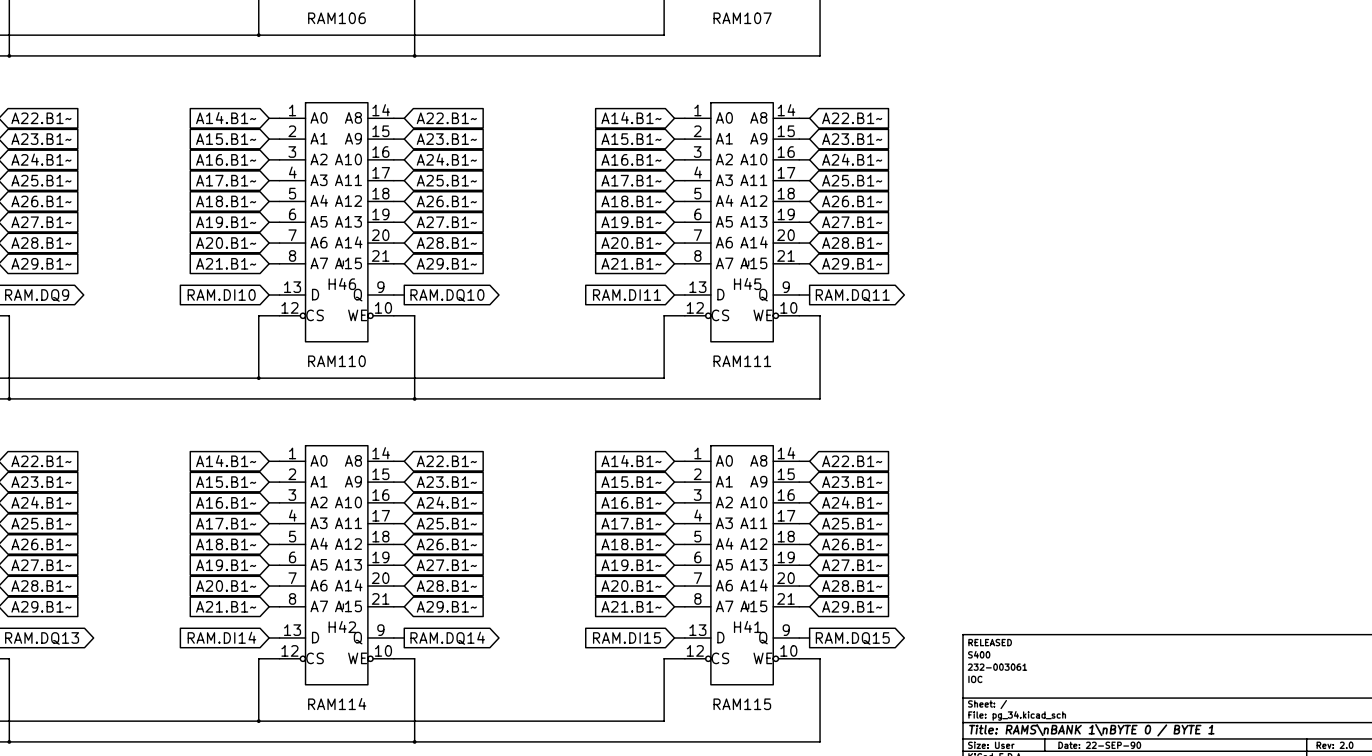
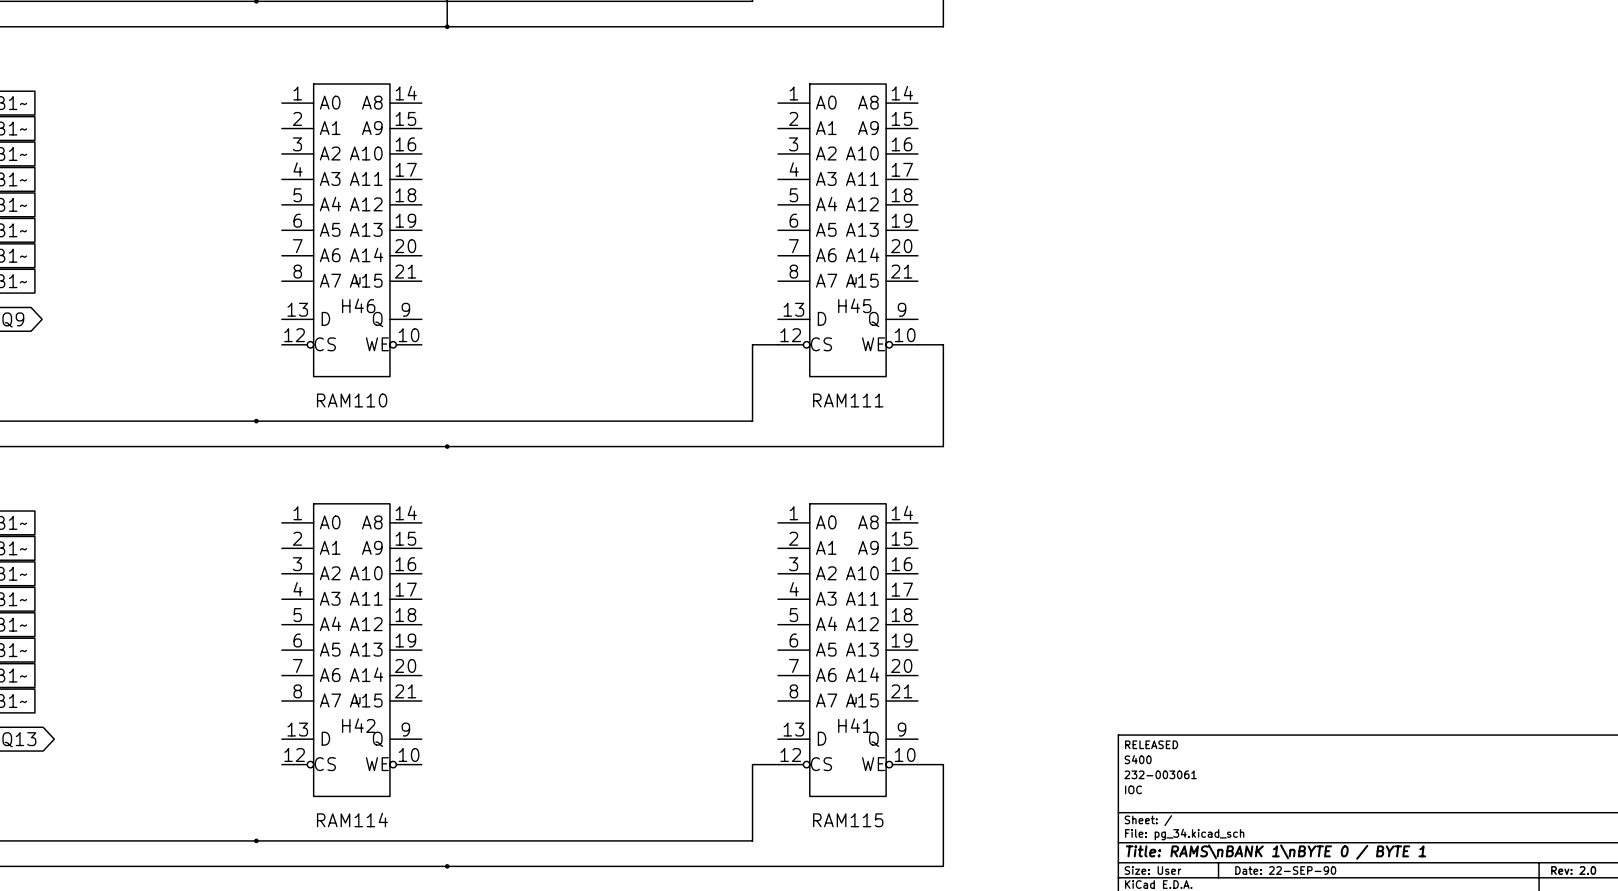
global label: A14.B1~ (226, 118) -> none
wire: (269, 118) (279, 118) -> none
wire: (393, 118) (404, 118) -> none
global label: A22.B1~ (446, 118) -> none
global label: A14.B1~ (631, 118) -> none
wire: (674, 118) (684, 118) -> none
wire: (799, 118) (809, 118) -> none
global label: A22.B1~ (852, 118) -> none
global label: A15.B1~ (226, 139) -> none
wire: (269, 139) (279, 139) -> none
wire: (393, 139) (404, 139) -> none
global label: A23.B1~ (446, 139) -> none
global label: A15.B1~ (631, 139) -> none
wire: (674, 139) (684, 139) -> none
wire: (799, 139) (809, 139) -> none
global label: A23.B1~ (852, 139) -> none
global label: A16.B1~ (226, 159) -> none
wire: (269, 159) (279, 159) -> none
wire: (393, 159) (404, 159) -> none
global label: A24.B1~ (446, 159) -> none
global label: A16.B1~ (631, 159) -> none
wire: (674, 159) (684, 159) -> none
wire: (799, 159) (809, 159) -> none
global label: A24.B1~ (852, 159) -> none
global label: A17.B1~ (226, 180) -> none
wire: (269, 180) (279, 180) -> none
wire: (393, 180) (404, 180) -> none
global label: A25.B1~ (446, 180) -> none
global label: A17.B1~ (631, 180) -> none
wire: (674, 180) (684, 180) -> none
wire: (799, 180) (809, 180) -> none
global label: A25.B1~ (852, 180) -> none
global label: A18.B1~ (226, 201) -> none
wire: (269, 201) (279, 201) -> none
wire: (393, 201) (404, 201) -> none
global label: A26.B1~ (446, 201) -> none
global label: A18.B1~ (631, 201) -> none
wire: (674, 201) (684, 201) -> none
wire: (799, 201) (809, 201) -> none
global label: A26.B1~ (852, 201) -> none
global label: A19.B1~ (226, 222) -> none
wire: (269, 222) (279, 222) -> none
wire: (393, 222) (404, 222) -> none
global label: A27.B1~ (446, 222) -> none
global label: A19.B1~ (631, 222) -> none
wire: (674, 222) (684, 222) -> none
wire: (799, 222) (809, 222) -> none
global label: A27.B1~ (852, 222) -> none
global label: A20.B1~ (226, 243) -> none
wire: (269, 243) (279, 243) -> none
wire: (393, 243) (404, 243) -> none
global label: A28.B1~ (446, 243) -> none
global label: A20.B1~ (631, 243) -> none
wire: (674, 243) (684, 243) -> none
wire: (799, 243) (809, 243) -> none
global label: A28.B1~ (852, 243) -> none
global label: A21.B1~ (226, 263) -> none
wire: (269, 263) (279, 263) -> none
wire: (393, 263) (404, 263) -> none
global label: A29.B1~ (446, 263) -> none
global label: A21.B1~ (631, 263) -> none
wire: (674, 263) (684, 263) -> none
wire: (799, 263) (809, 263) -> none
global label: A29.B1~ (852, 263) -> none
global label: RAM.DI10 (221, 295) -> none
wire: (269, 295) (279, 295) -> none
wire: (393, 295) (404, 295) -> none
global label: RAM.DQ10 (447, 295) -> none
global label: RAM.DI11 (627, 295) -> none
wire: (674, 295) (684, 295) -> none
wire: (799, 295) (809, 295) -> none
global label: RAM.DQ11 (852, 295) -> none
wire: (279, 315) (258, 315) (258, 378) -> none
wire: (393, 315) (414, 315) (414, 398) -> none
global label: A14.B1~ (226, 461) -> none
wire: (269, 461) (279, 461) -> none
wire: (393, 461) (404, 461) -> none
global label: A22.B1~ (446, 461) -> none
global label: A14.B1~ (631, 461) -> none
wire: (674, 461) (684, 461) -> none
wire: (799, 461) (809, 461) -> none
global label: A22.B1~ (852, 461) -> none
global label: A15.B1~ (226, 482) -> none
wire: (269, 482) (279, 482) -> none
wire: (393, 482) (404, 482) -> none
global label: A23.B1~ (446, 482) -> none
global label: A15.B1~ (631, 482) -> none
wire: (674, 482) (684, 482) -> none
wire: (799, 482) (809, 482) -> none
global label: A23.B1~ (852, 482) -> none
global label: A16.B1~ (226, 502) -> none
wire: (269, 502) (279, 502) -> none
wire: (393, 502) (404, 502) -> none
global label: A24.B1~ (446, 502) -> none
global label: A16.B1~ (631, 502) -> none
wire: (674, 502) (684, 502) -> none
wire: (799, 502) (809, 502) -> none
global label: A24.B1~ (852, 502) -> none
global label: A17.B1~ (226, 523) -> none
wire: (269, 523) (279, 523) -> none
wire: (393, 523) (404, 523) -> none
global label: A25.B1~ (446, 523) -> none
global label: A17.B1~ (631, 523) -> none
wire: (674, 523) (684, 523) -> none
wire: (799, 523) (809, 523) -> none
global label: A25.B1~ (852, 523) -> none
global label: A18.B1~ (226, 544) -> none
wire: (269, 544) (279, 544) -> none
wire: (393, 544) (404, 544) -> none
global label: A26.B1~ (446, 544) -> none
global label: A18.B1~ (631, 544) -> none
wire: (674, 544) (684, 544) -> none
wire: (799, 544) (809, 544) -> none
global label: A26.B1~ (852, 544) -> none
global label: A19.B1~ (226, 565) -> none
wire: (269, 565) (279, 565) -> none
wire: (393, 565) (404, 565) -> none
global label: A27.B1~ (446, 565) -> none
global label: A19.B1~ (631, 565) -> none
wire: (674, 565) (684, 565) -> none
wire: (799, 565) (809, 565) -> none
global label: A27.B1~ (852, 565) -> none
global label: A20.B1~ (226, 586) -> none
wire: (269, 586) (279, 586) -> none
wire: (393, 586) (404, 586) -> none
global label: A28.B1~ (446, 586) -> none
global label: A20.B1~ (631, 586) -> none
wire: (674, 586) (684, 586) -> none
wire: (799, 586) (809, 586) -> none
global label: A28.B1~ (852, 586) -> none
global label: A21.B1~ (226, 606) -> none
wire: (269, 606) (279, 606) -> none
wire: (393, 606) (404, 606) -> none
global label: A29.B1~ (446, 606) -> none
global label: A21.B1~ (631, 606) -> none
wire: (674, 606) (684, 606) -> none
wire: (799, 606) (809, 606) -> none
global label: A29.B1~ (852, 606) -> none
global label: RAM.DI14 (221, 637) -> none
wire: (269, 637) (279, 637) -> none
wire: (393, 637) (404, 637) -> none
global label: RAM.DI15 (627, 637) -> none
wire: (674, 637) (684, 637) -> none
wire: (799, 637) (809, 637) -> none
global label: RAM.DQ14 (447, 638) -> none
global label: RAM.DQ15 (852, 638) -> none
wire: (279, 658) (258, 658) (258, 721) -> none
wire: (393, 658) (414, 658) (414, 741) -> none

